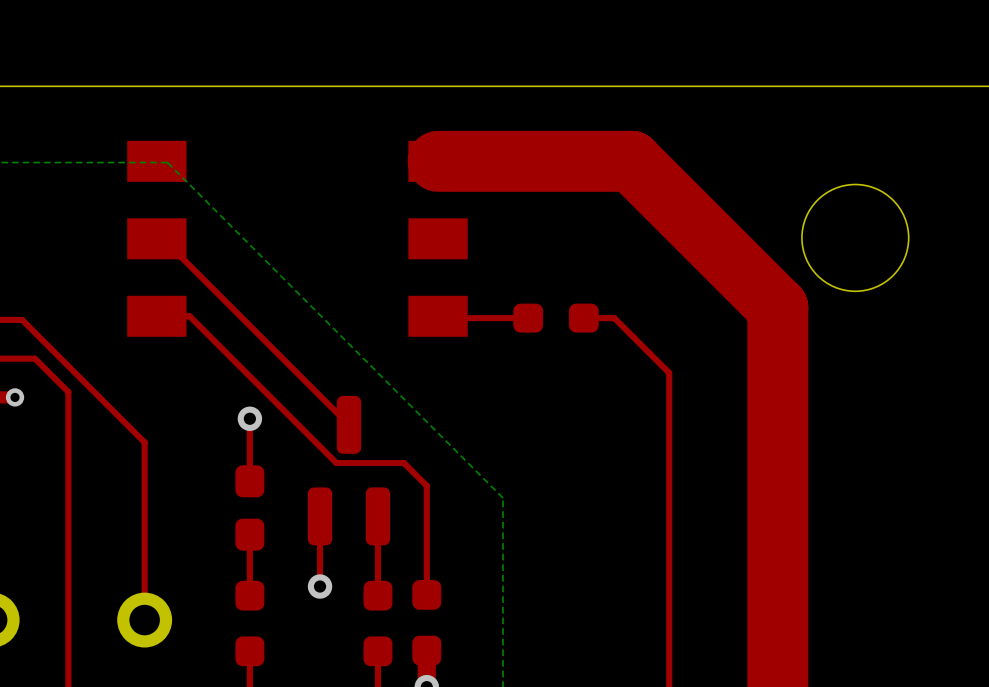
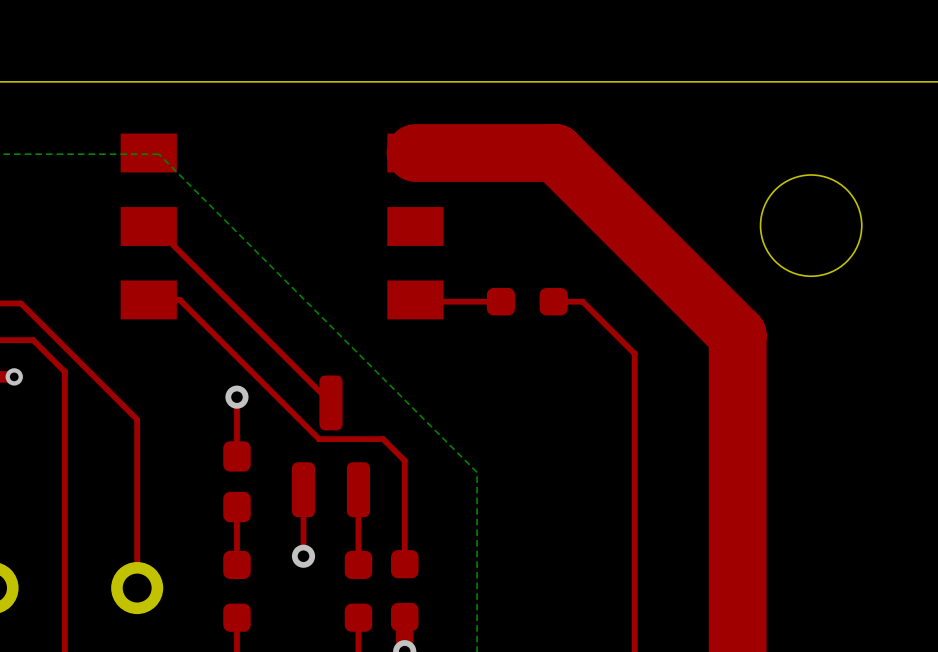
top track: (585, 161) (631, 161) (777, 307) (777, 353) -> (555, 153) (737, 335)

